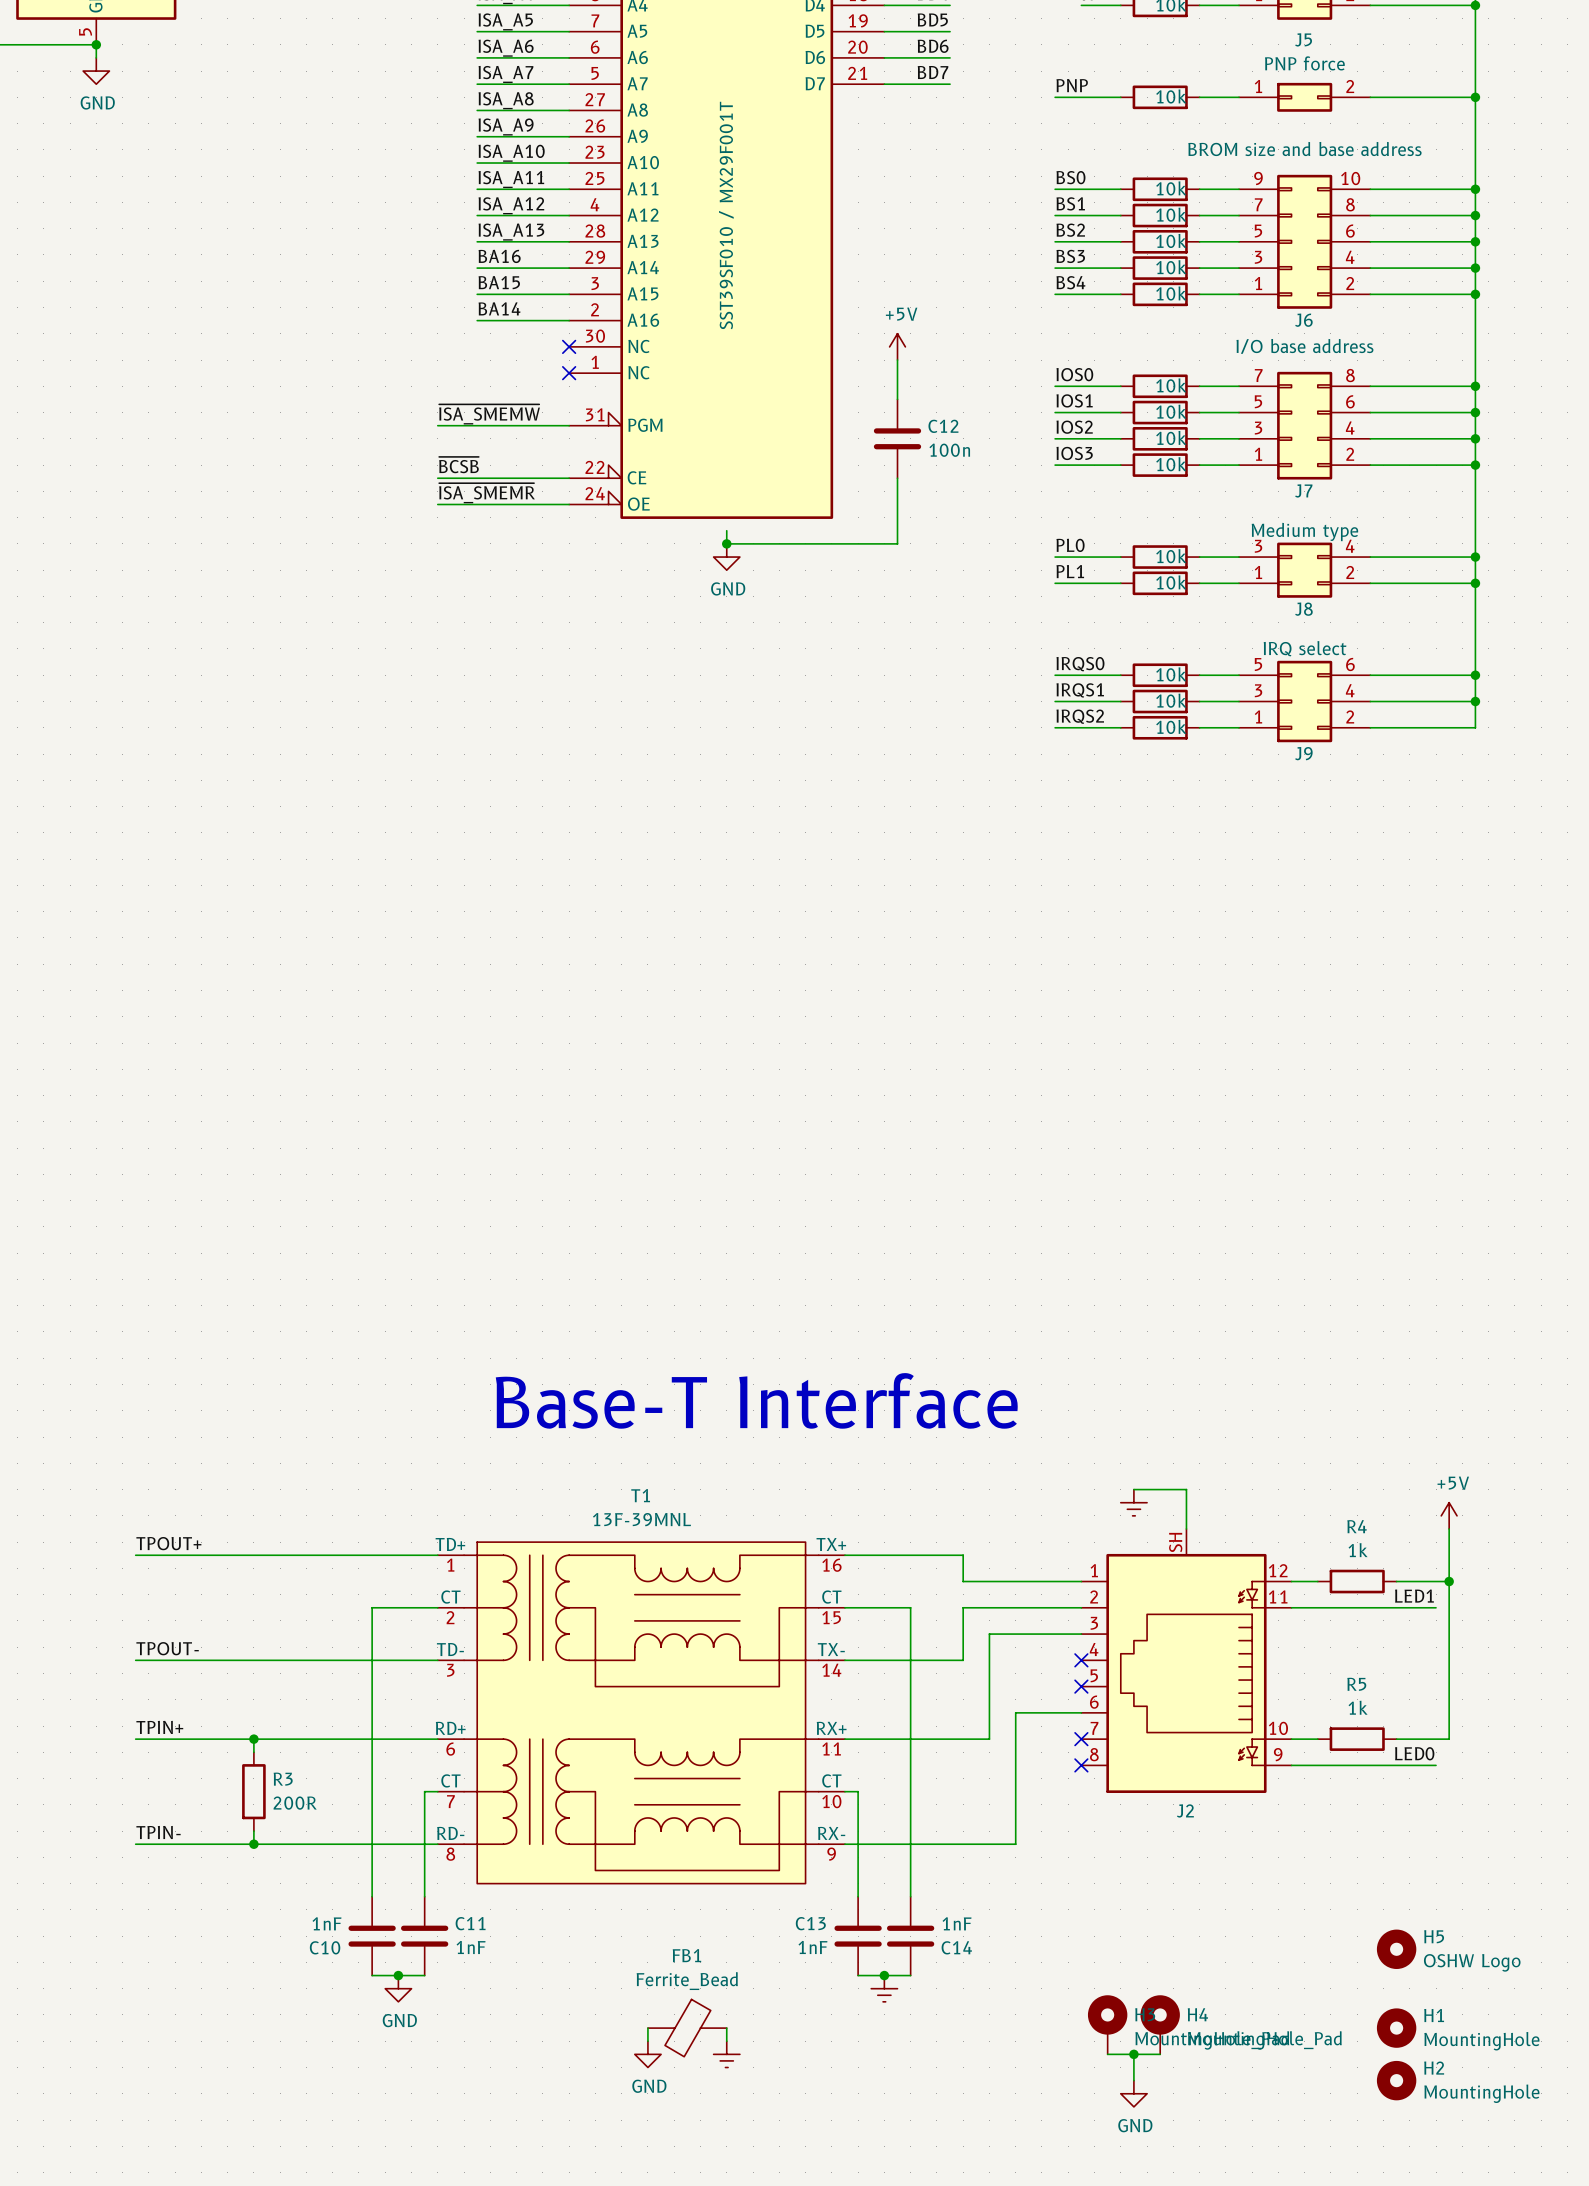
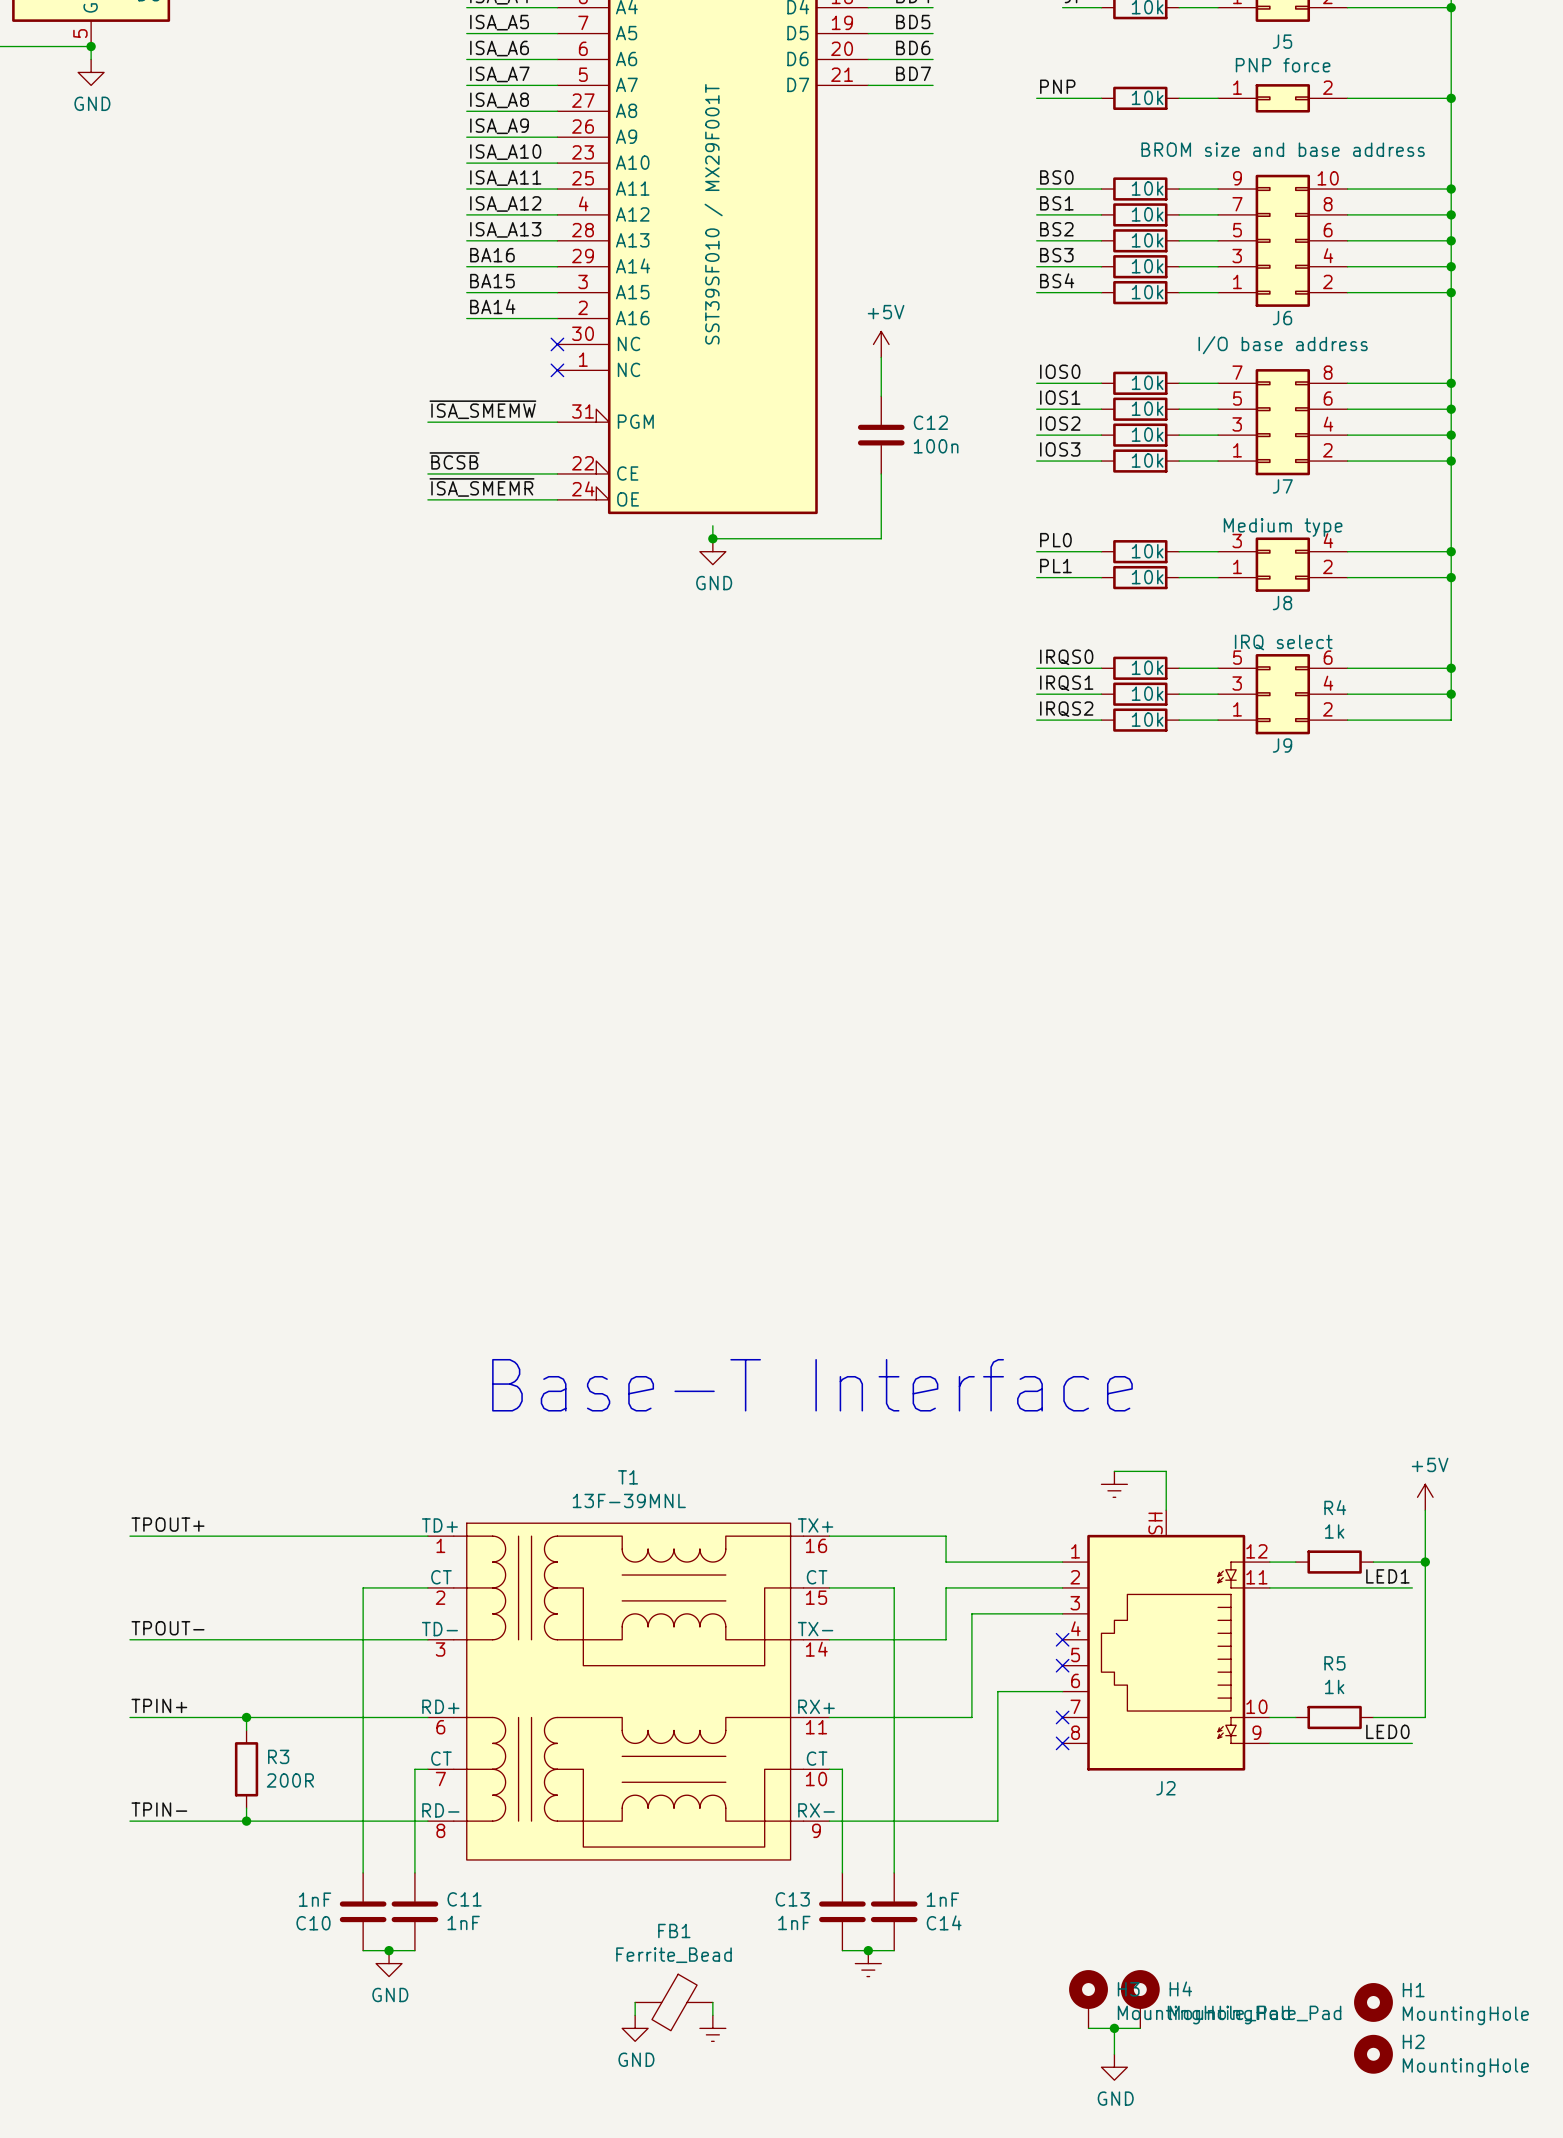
H5: OSHW Logo (1396, 1949) -> none

